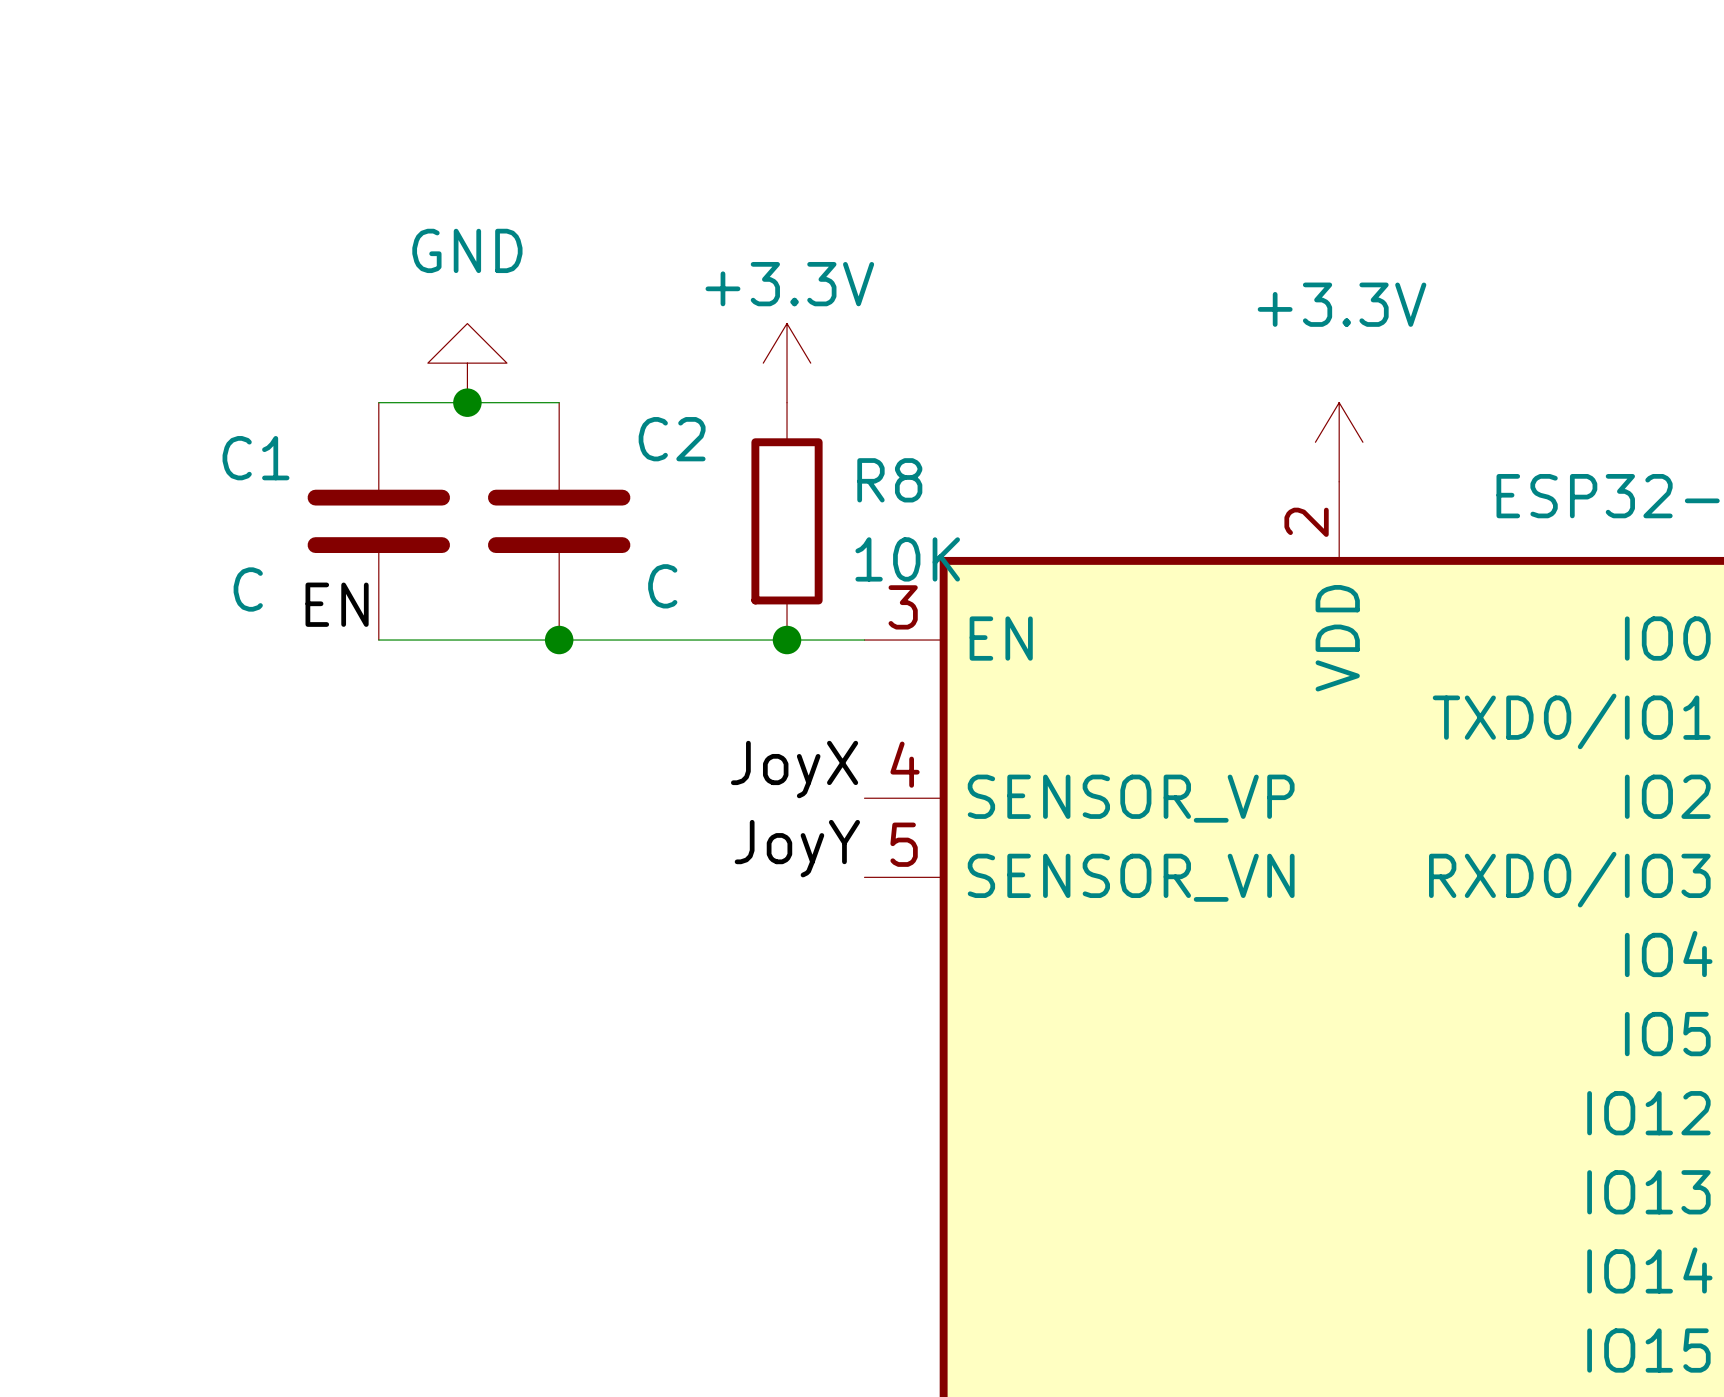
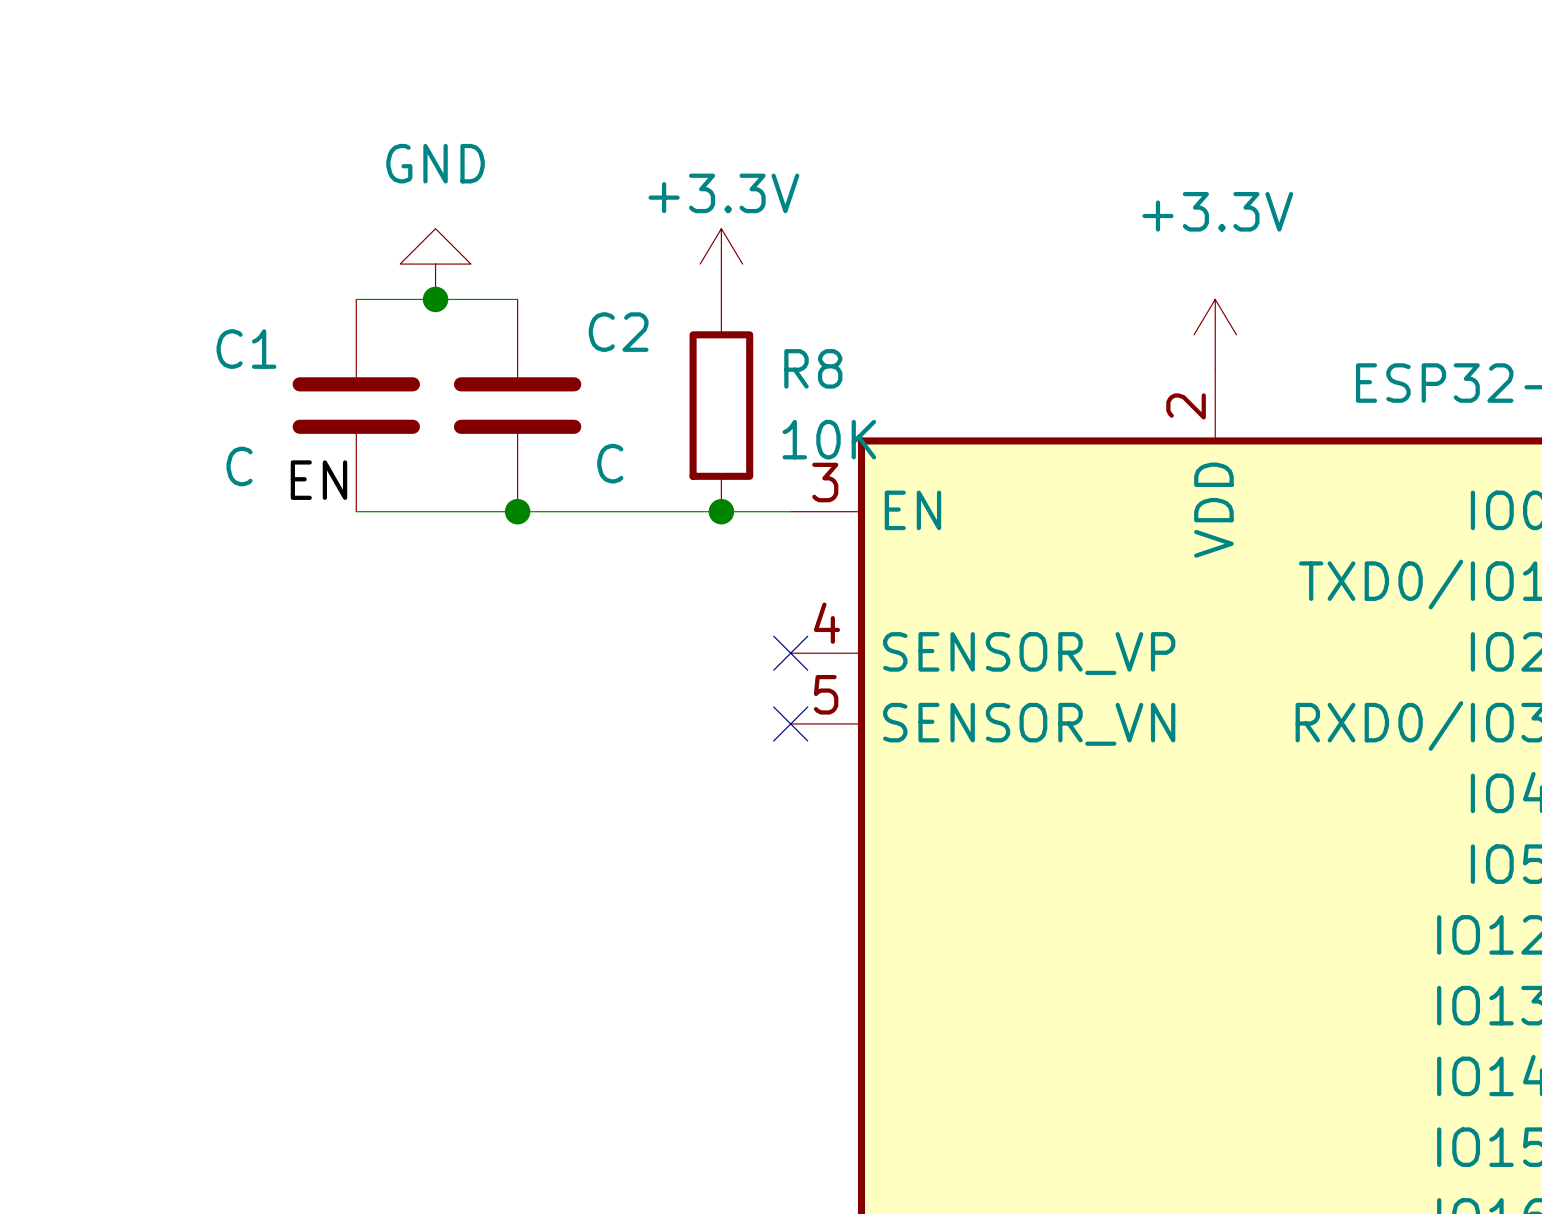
label: JoyX (794, 769) -> none
no-connect mark: none -> (790, 653)
label: JoyY (797, 848) -> none
no-connect mark: none -> (790, 723)

